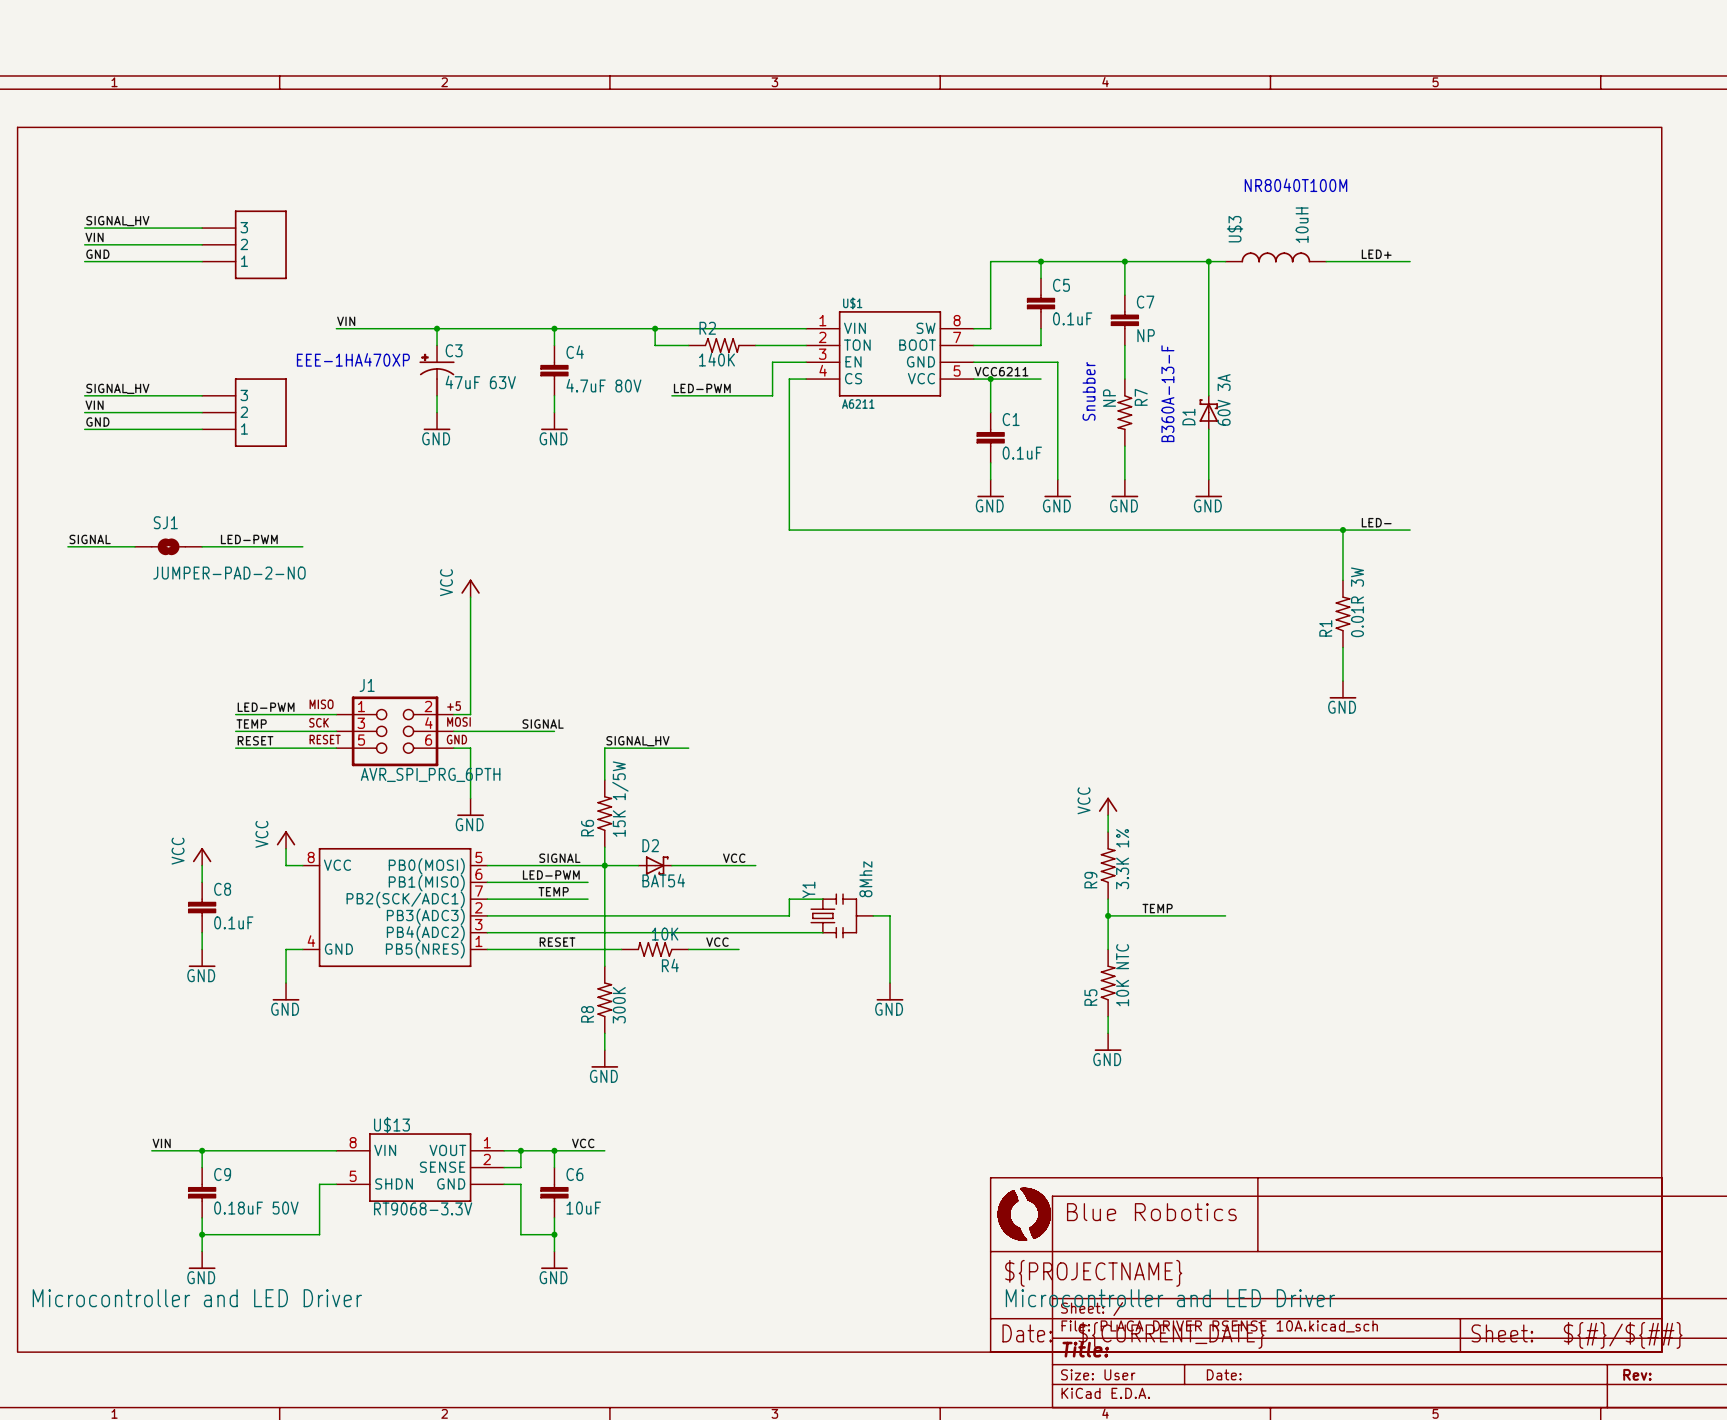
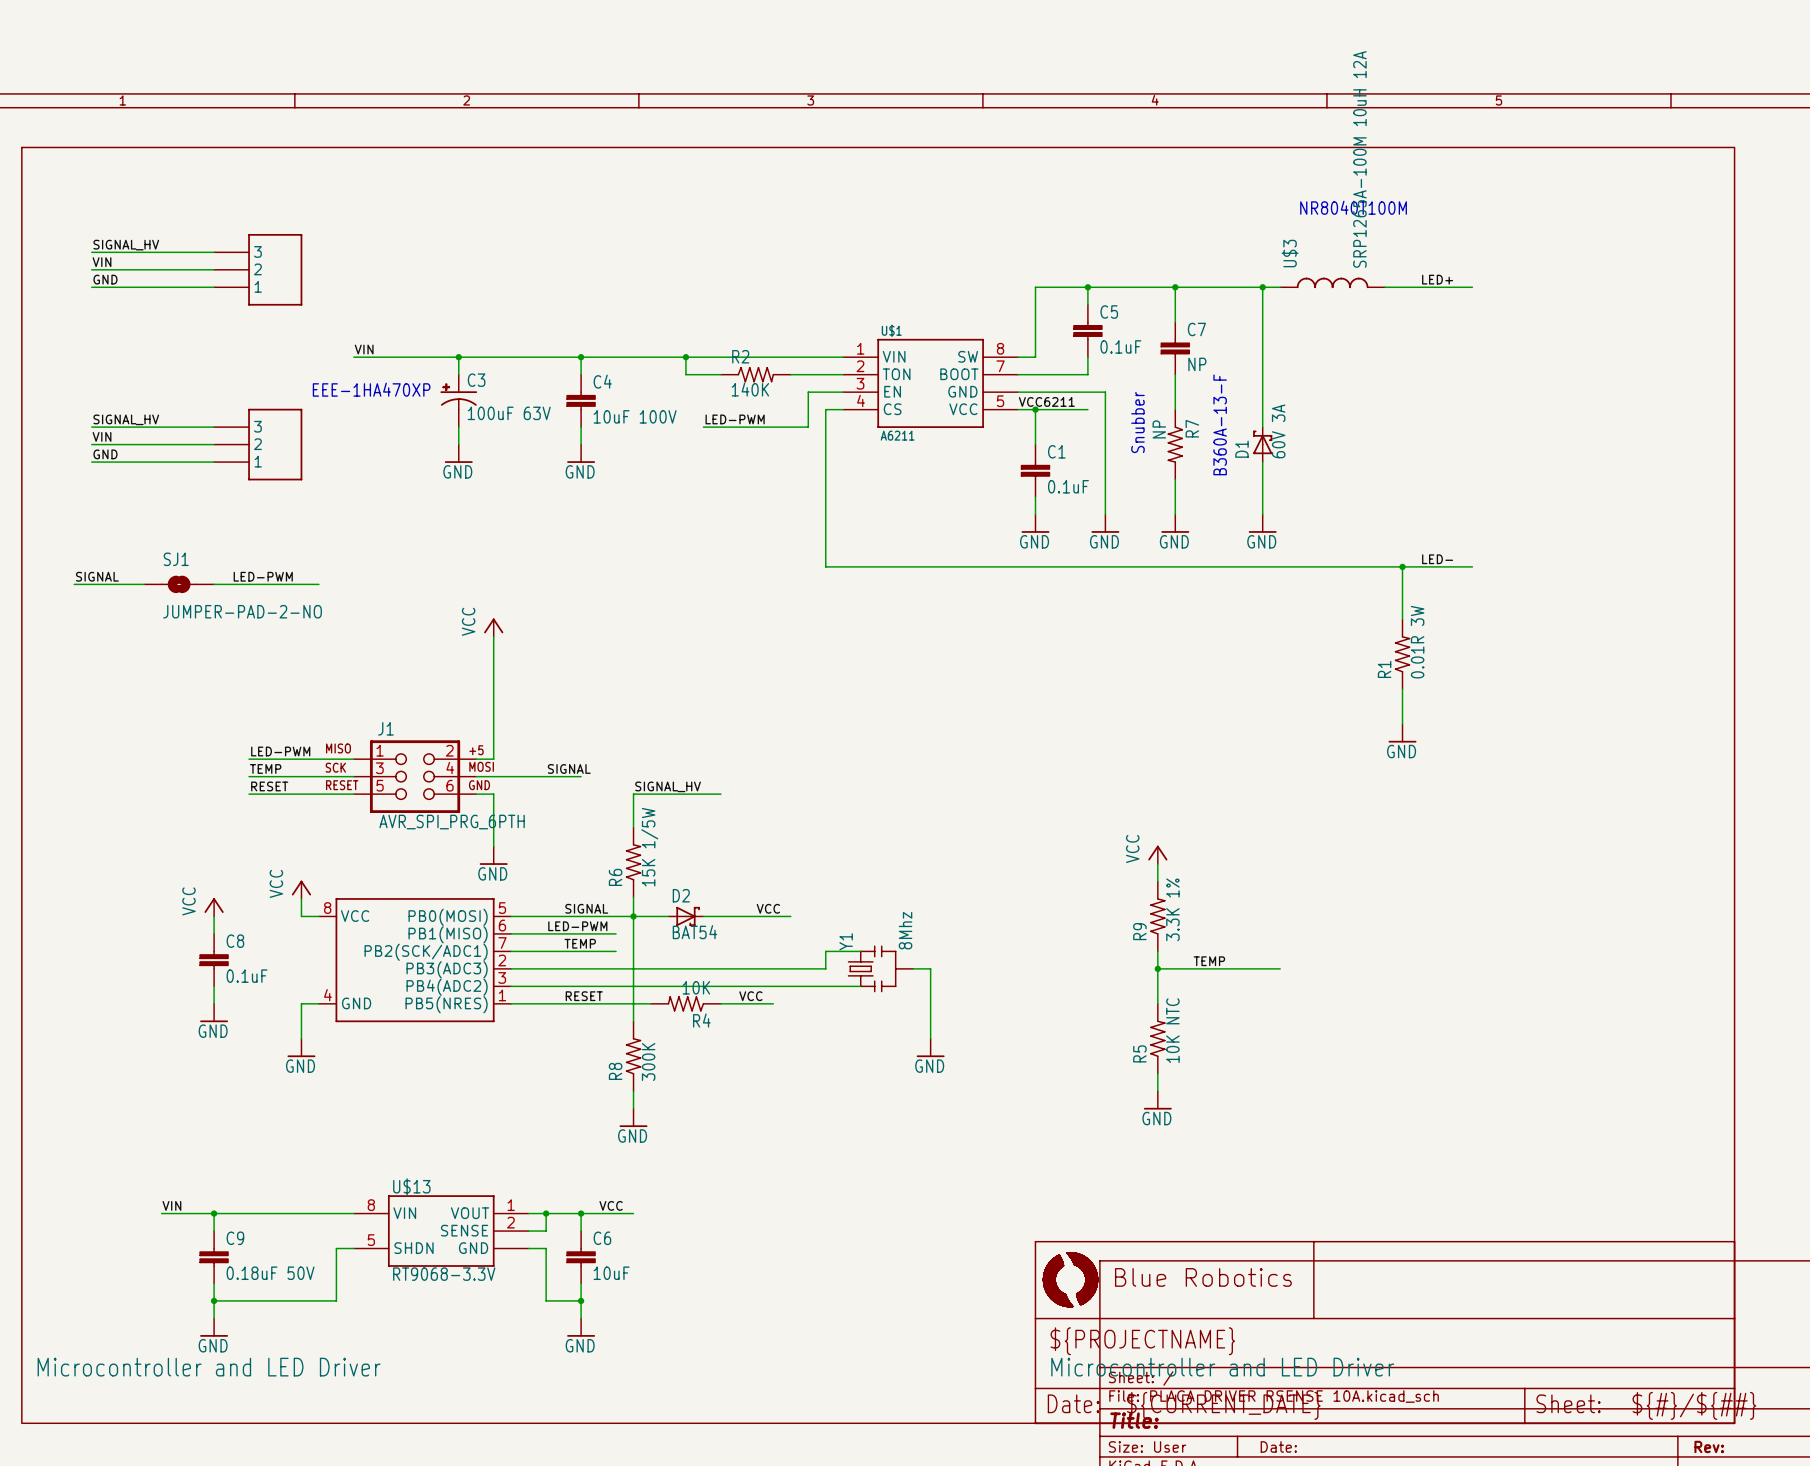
U$3 value: 10uH (1302, 225) -> SRP1265A-100M 10uH 12A (1359, 159)
C3 value: 47uF 63V (480, 382) -> 100uF 63V (509, 413)
C4 value: 4.7uF 80V (603, 385) -> 10uF 100V (635, 416)

